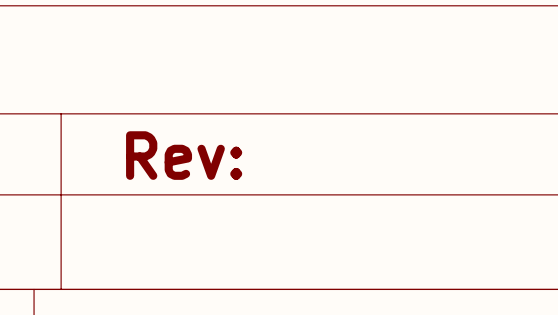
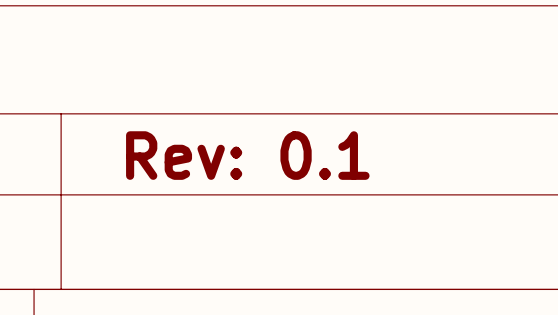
title block: Rev: (184, 155) -> Rev: 0.1 (247, 155)

